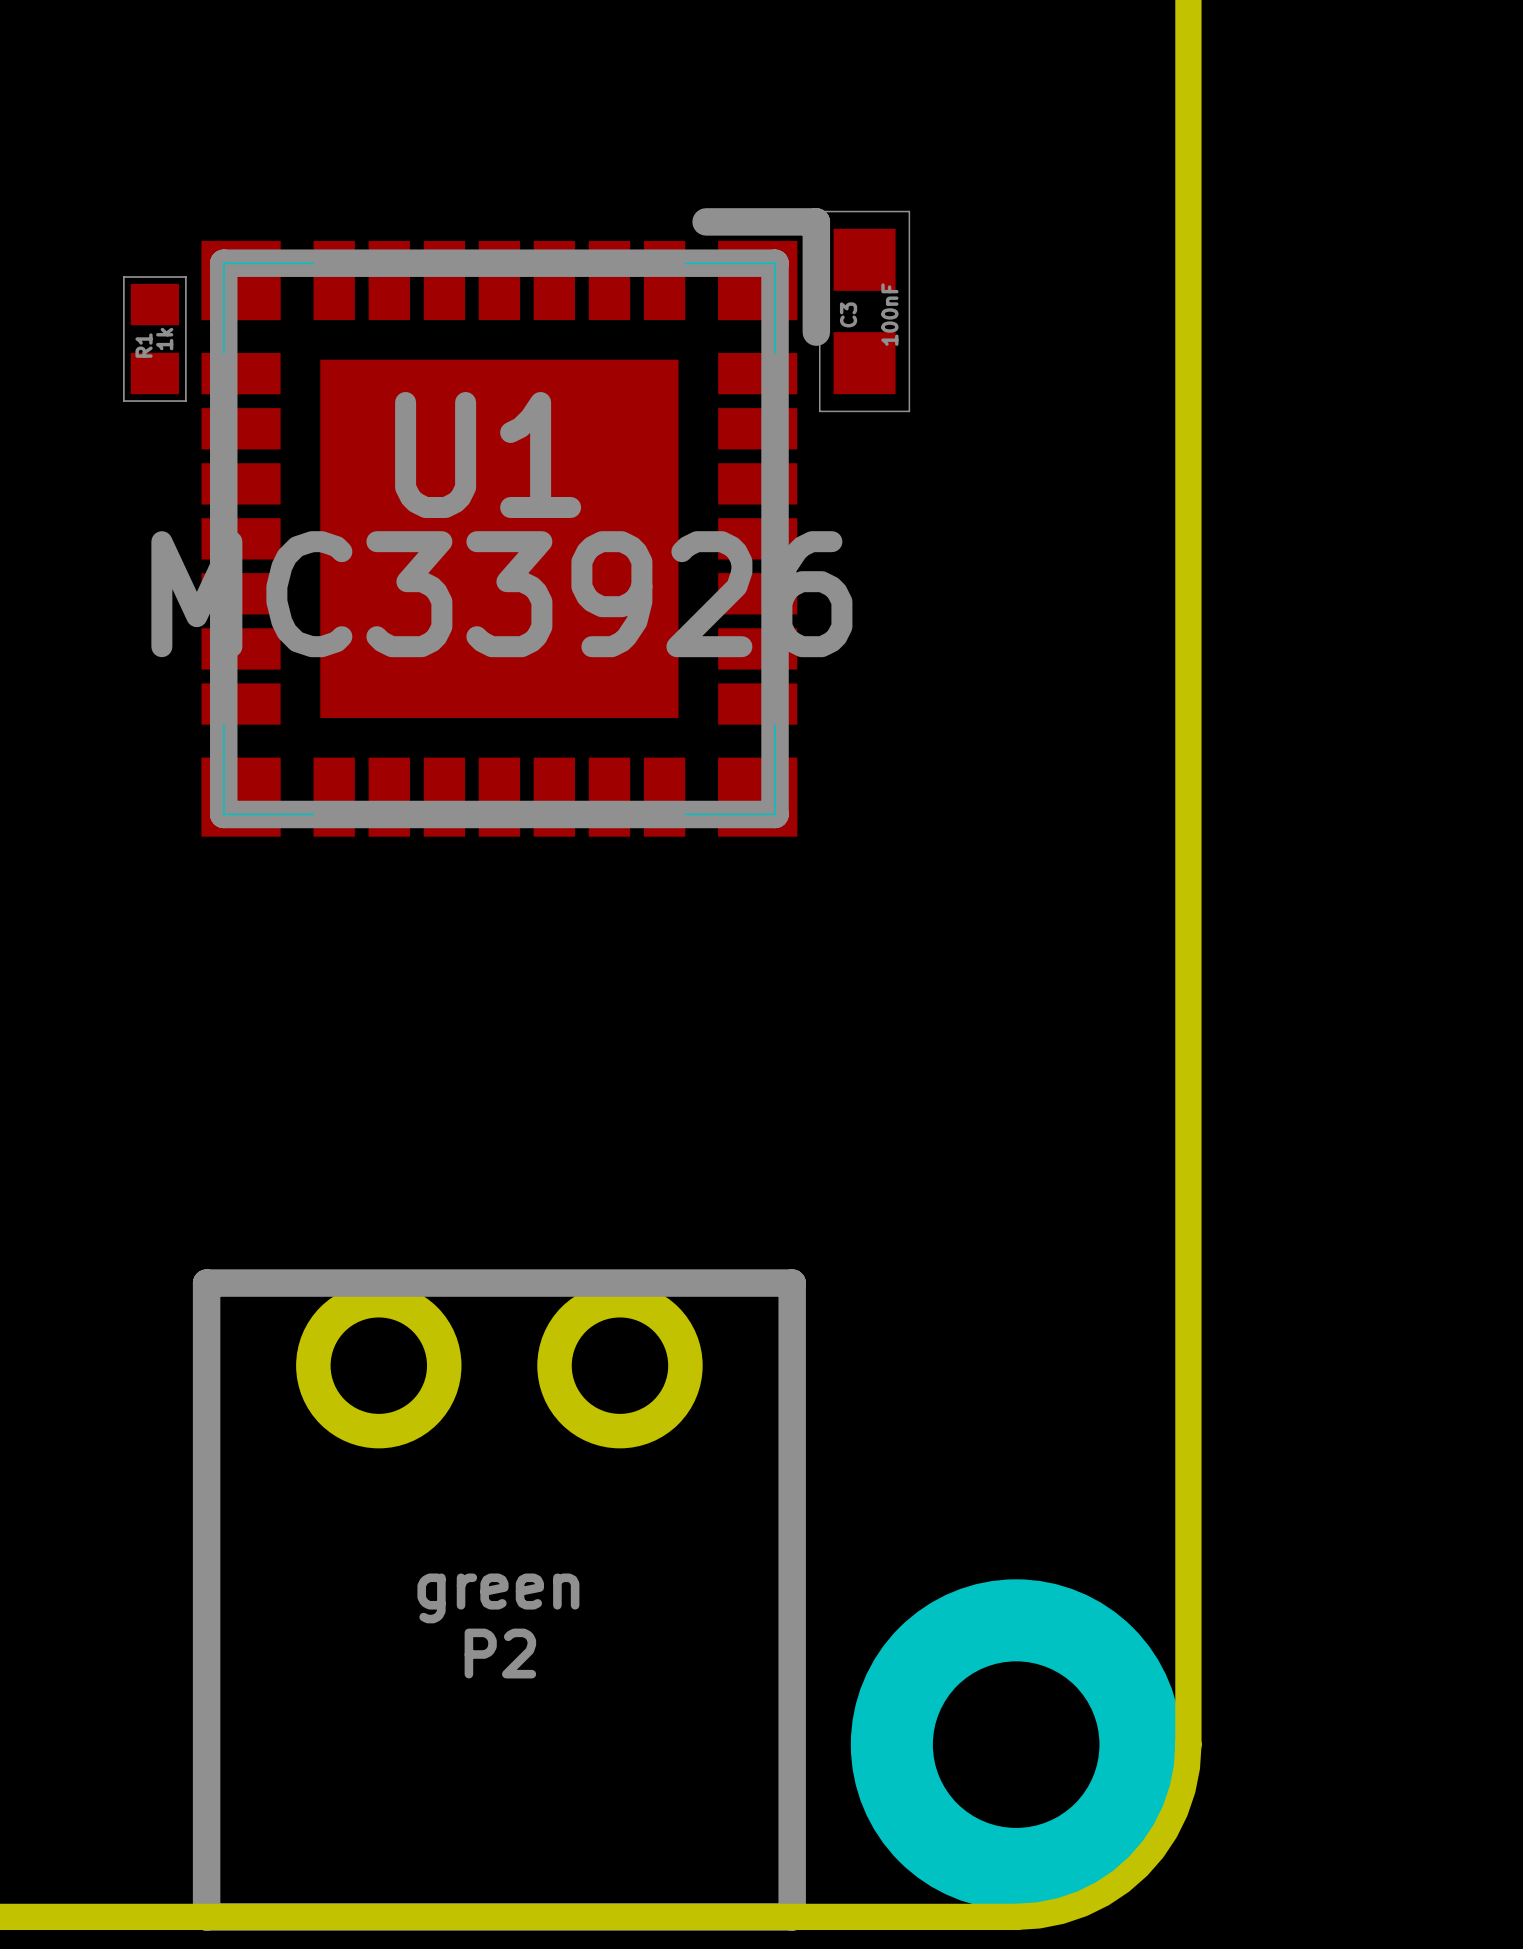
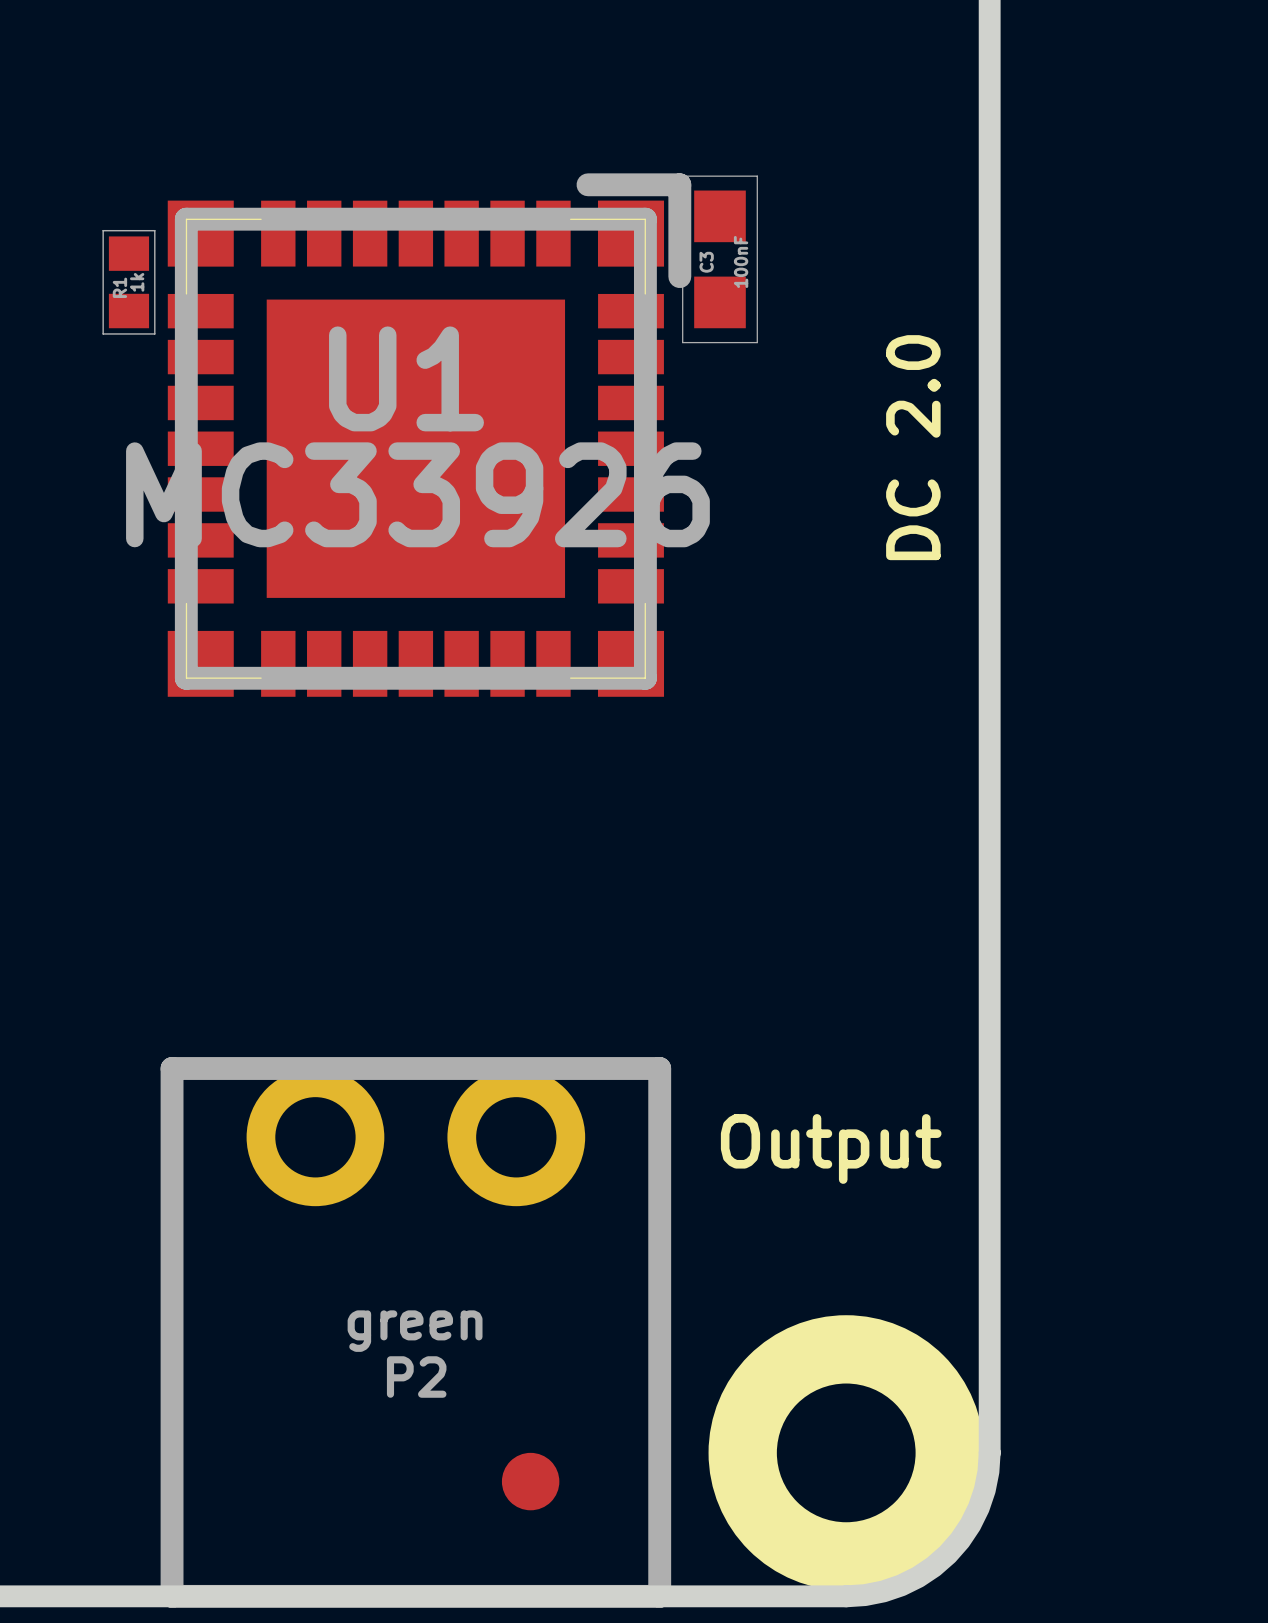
text: none -> DC 2.0 (913, 447)
text: none -> Output (831, 1148)
part: none -> (530, 1481)

